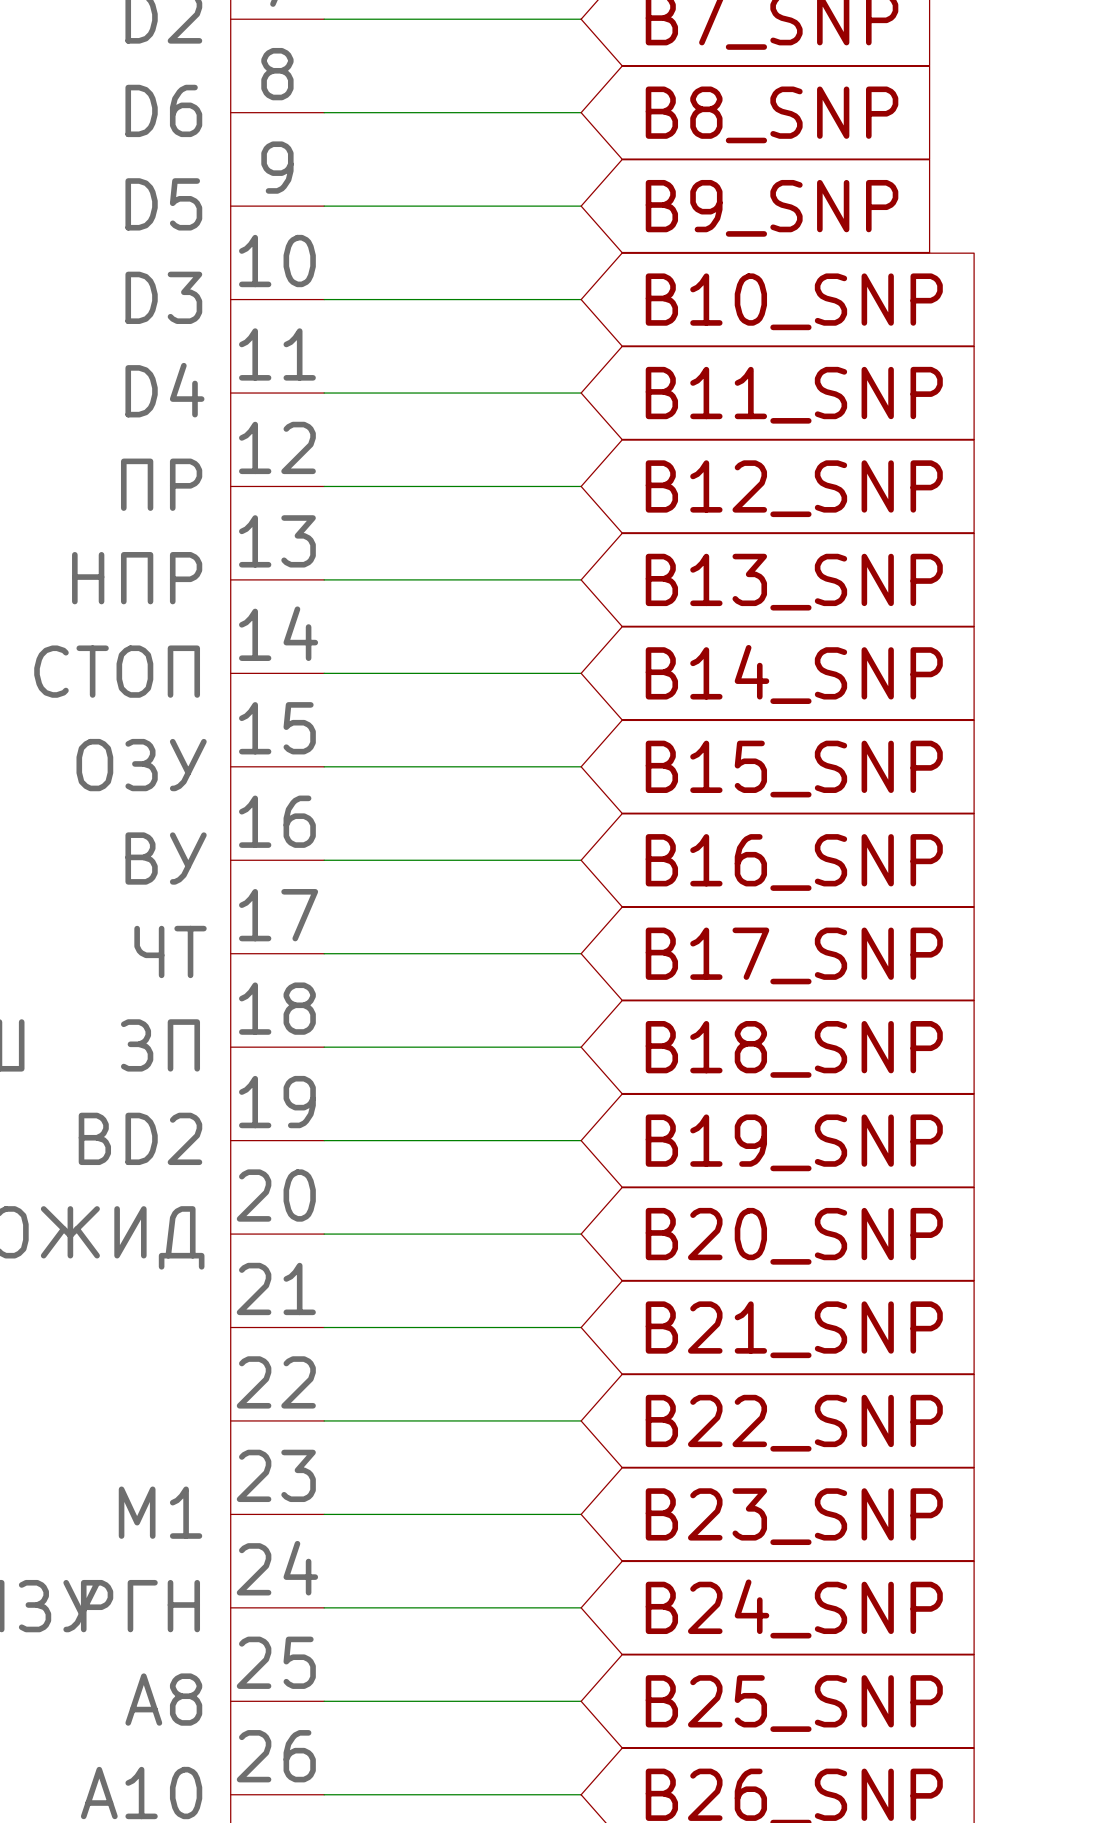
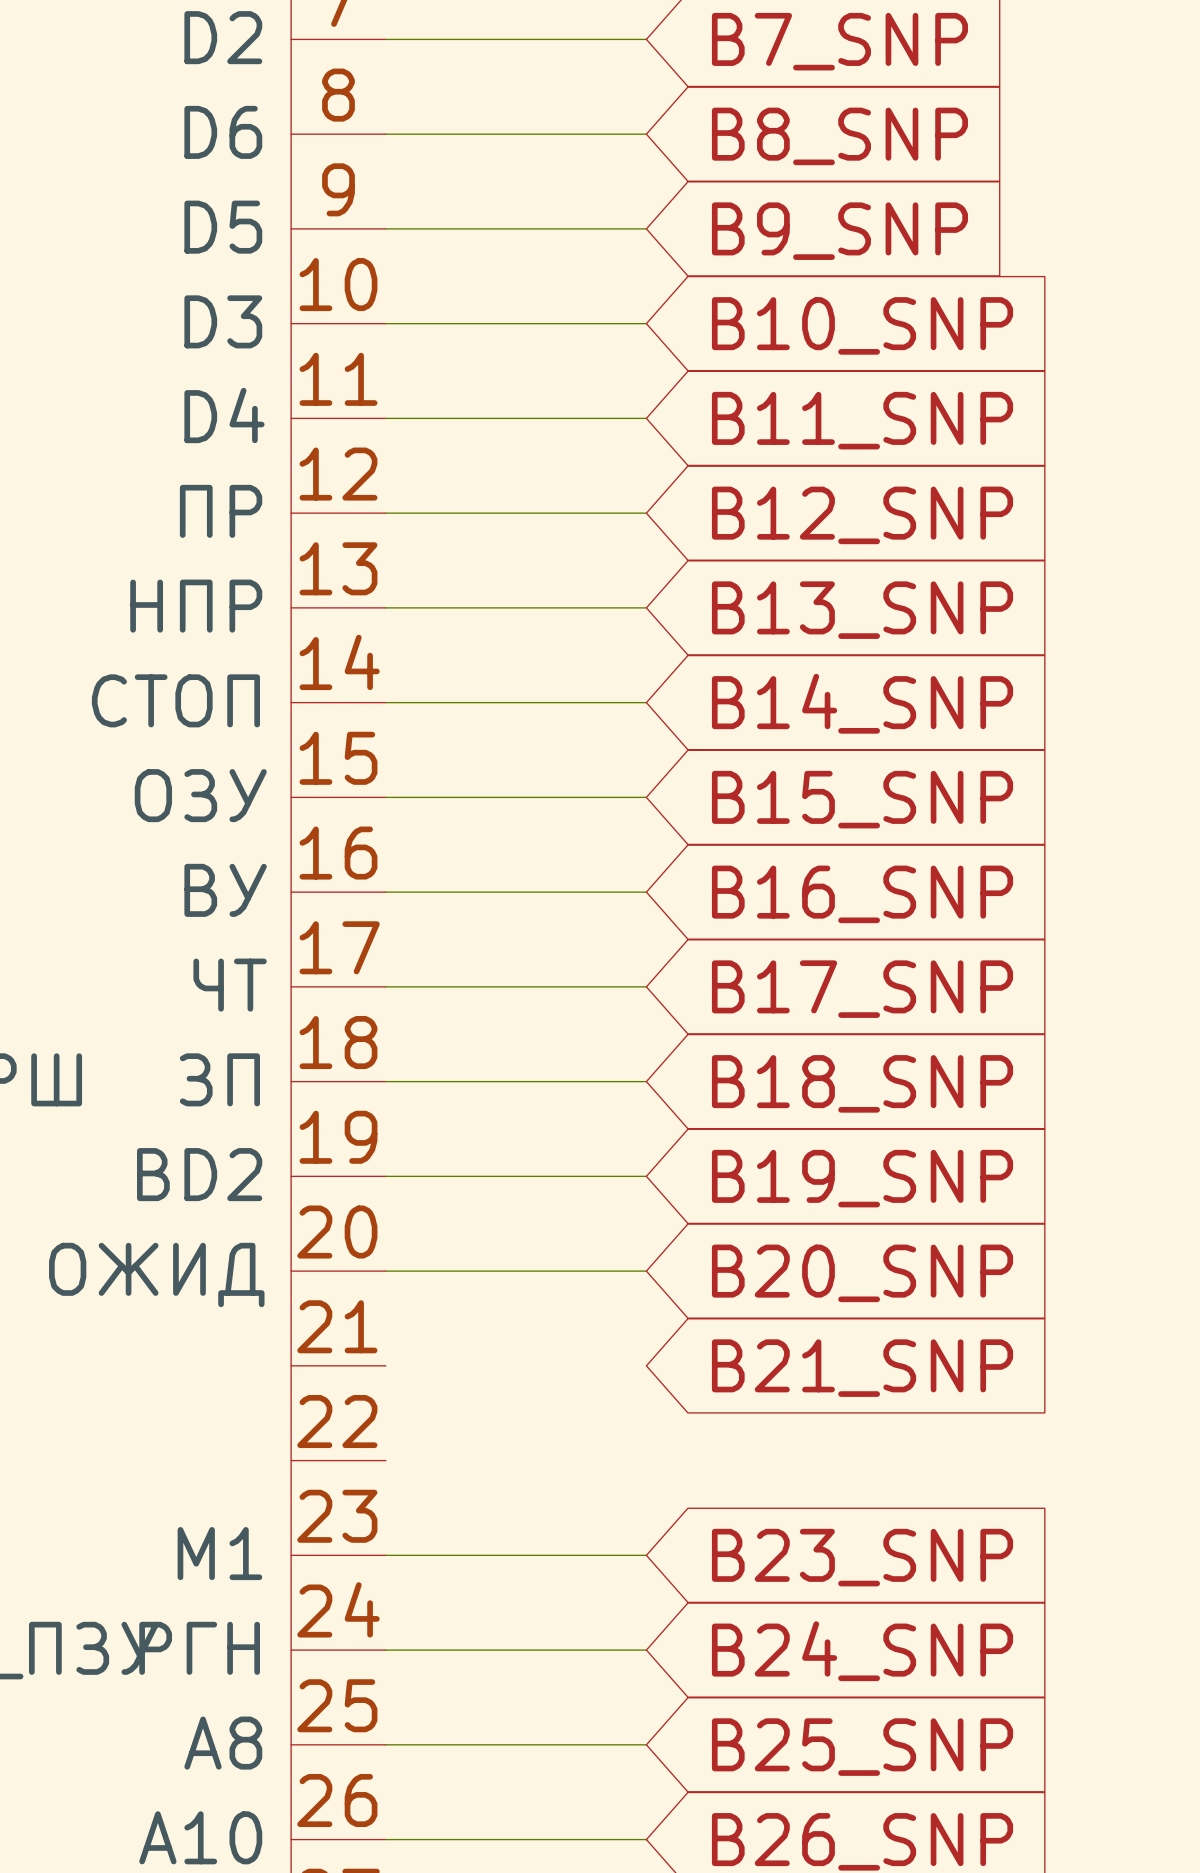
wire: (324, 1327) (581, 1327) -> none
wire: (324, 1420) (581, 1420) -> none
global label: B22_SNP (794, 1423) -> none

